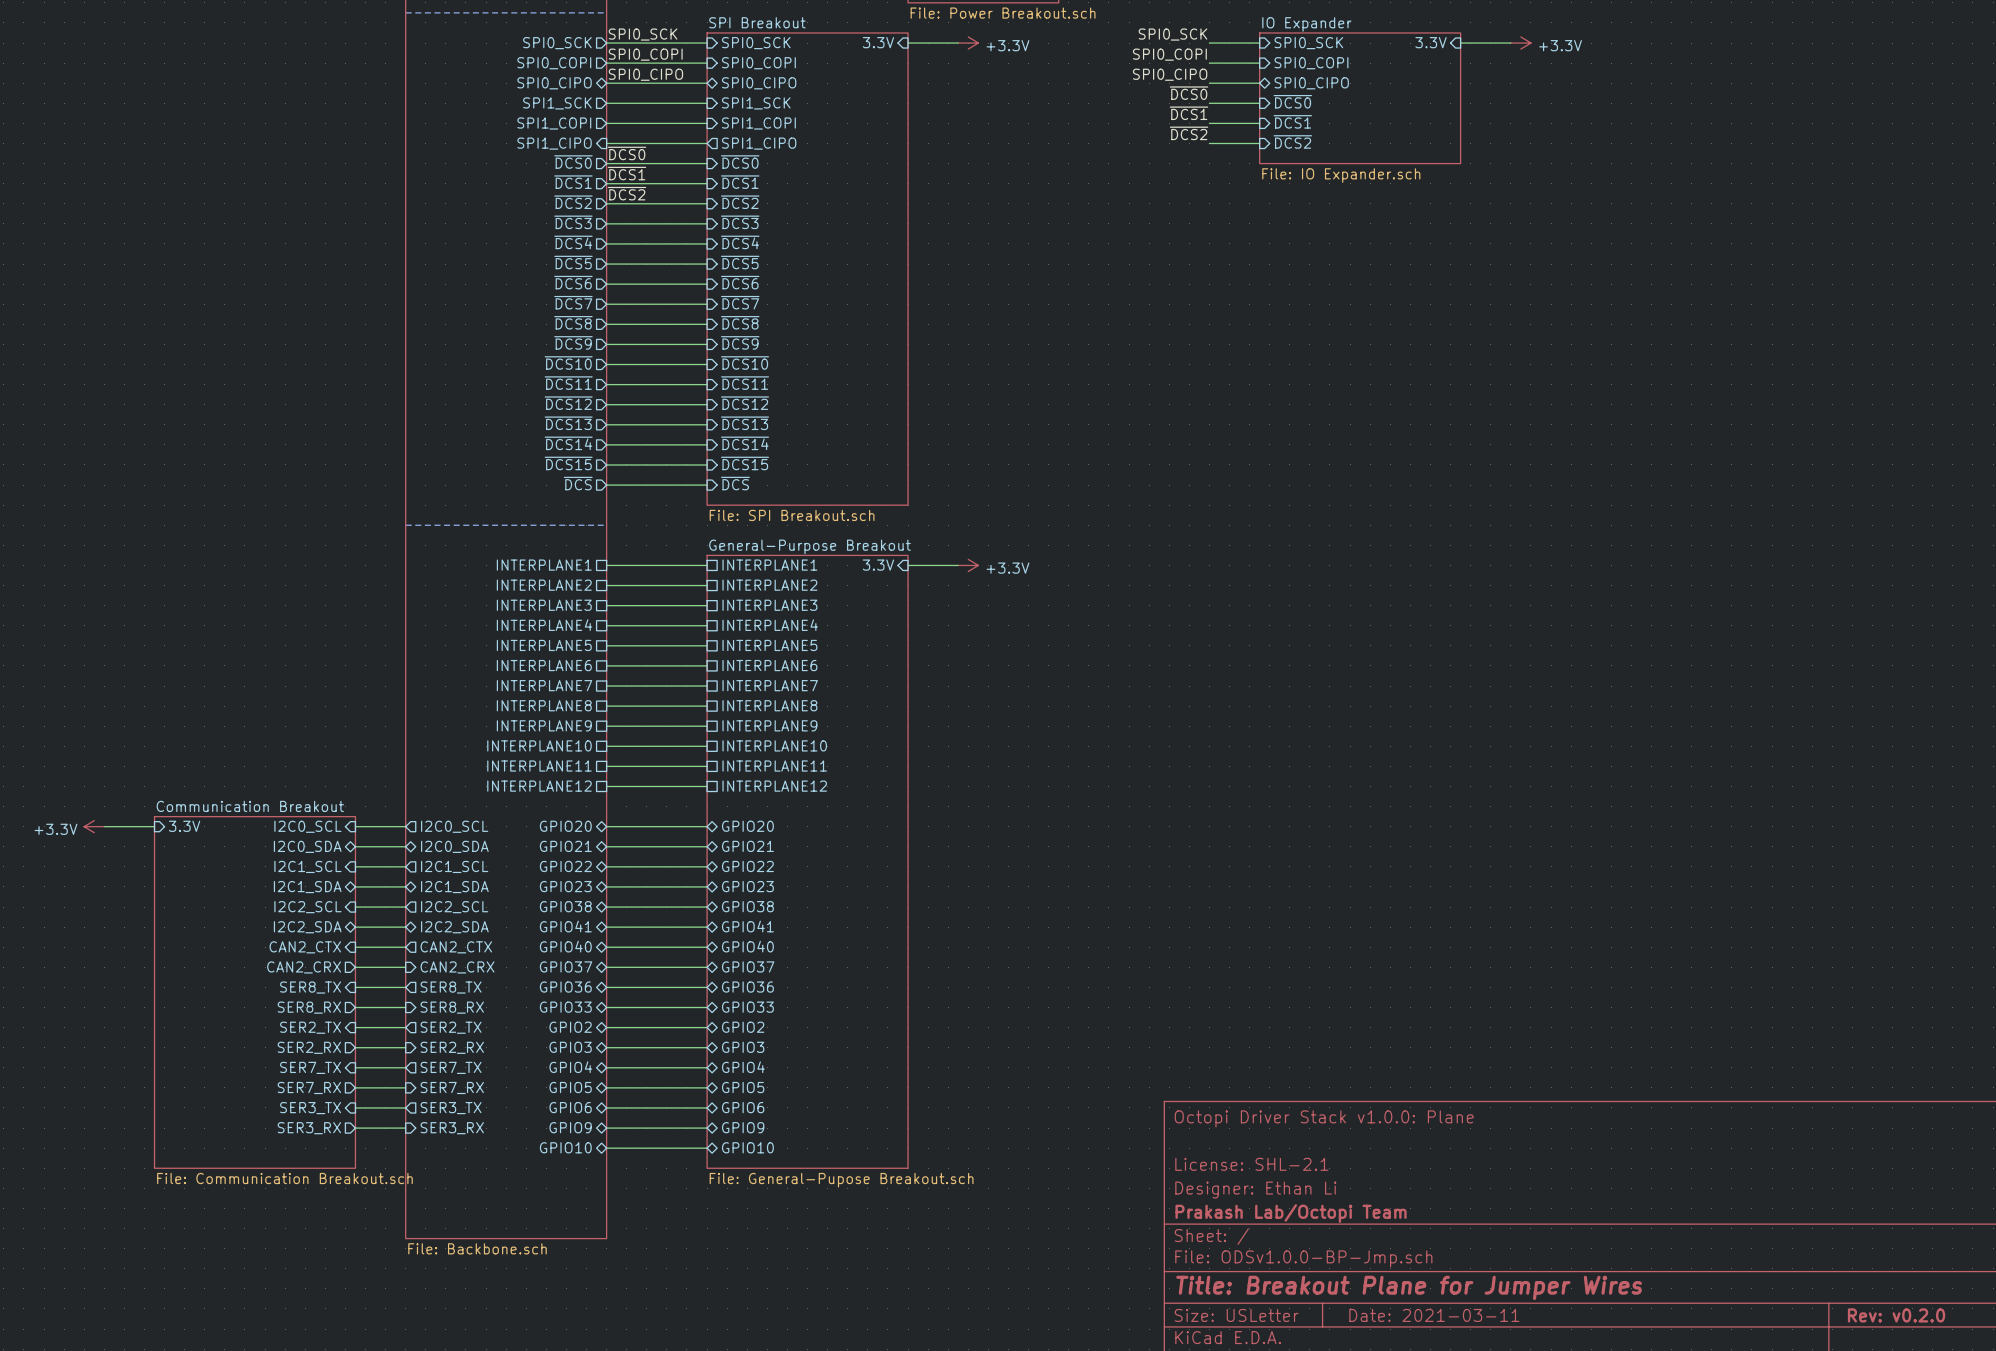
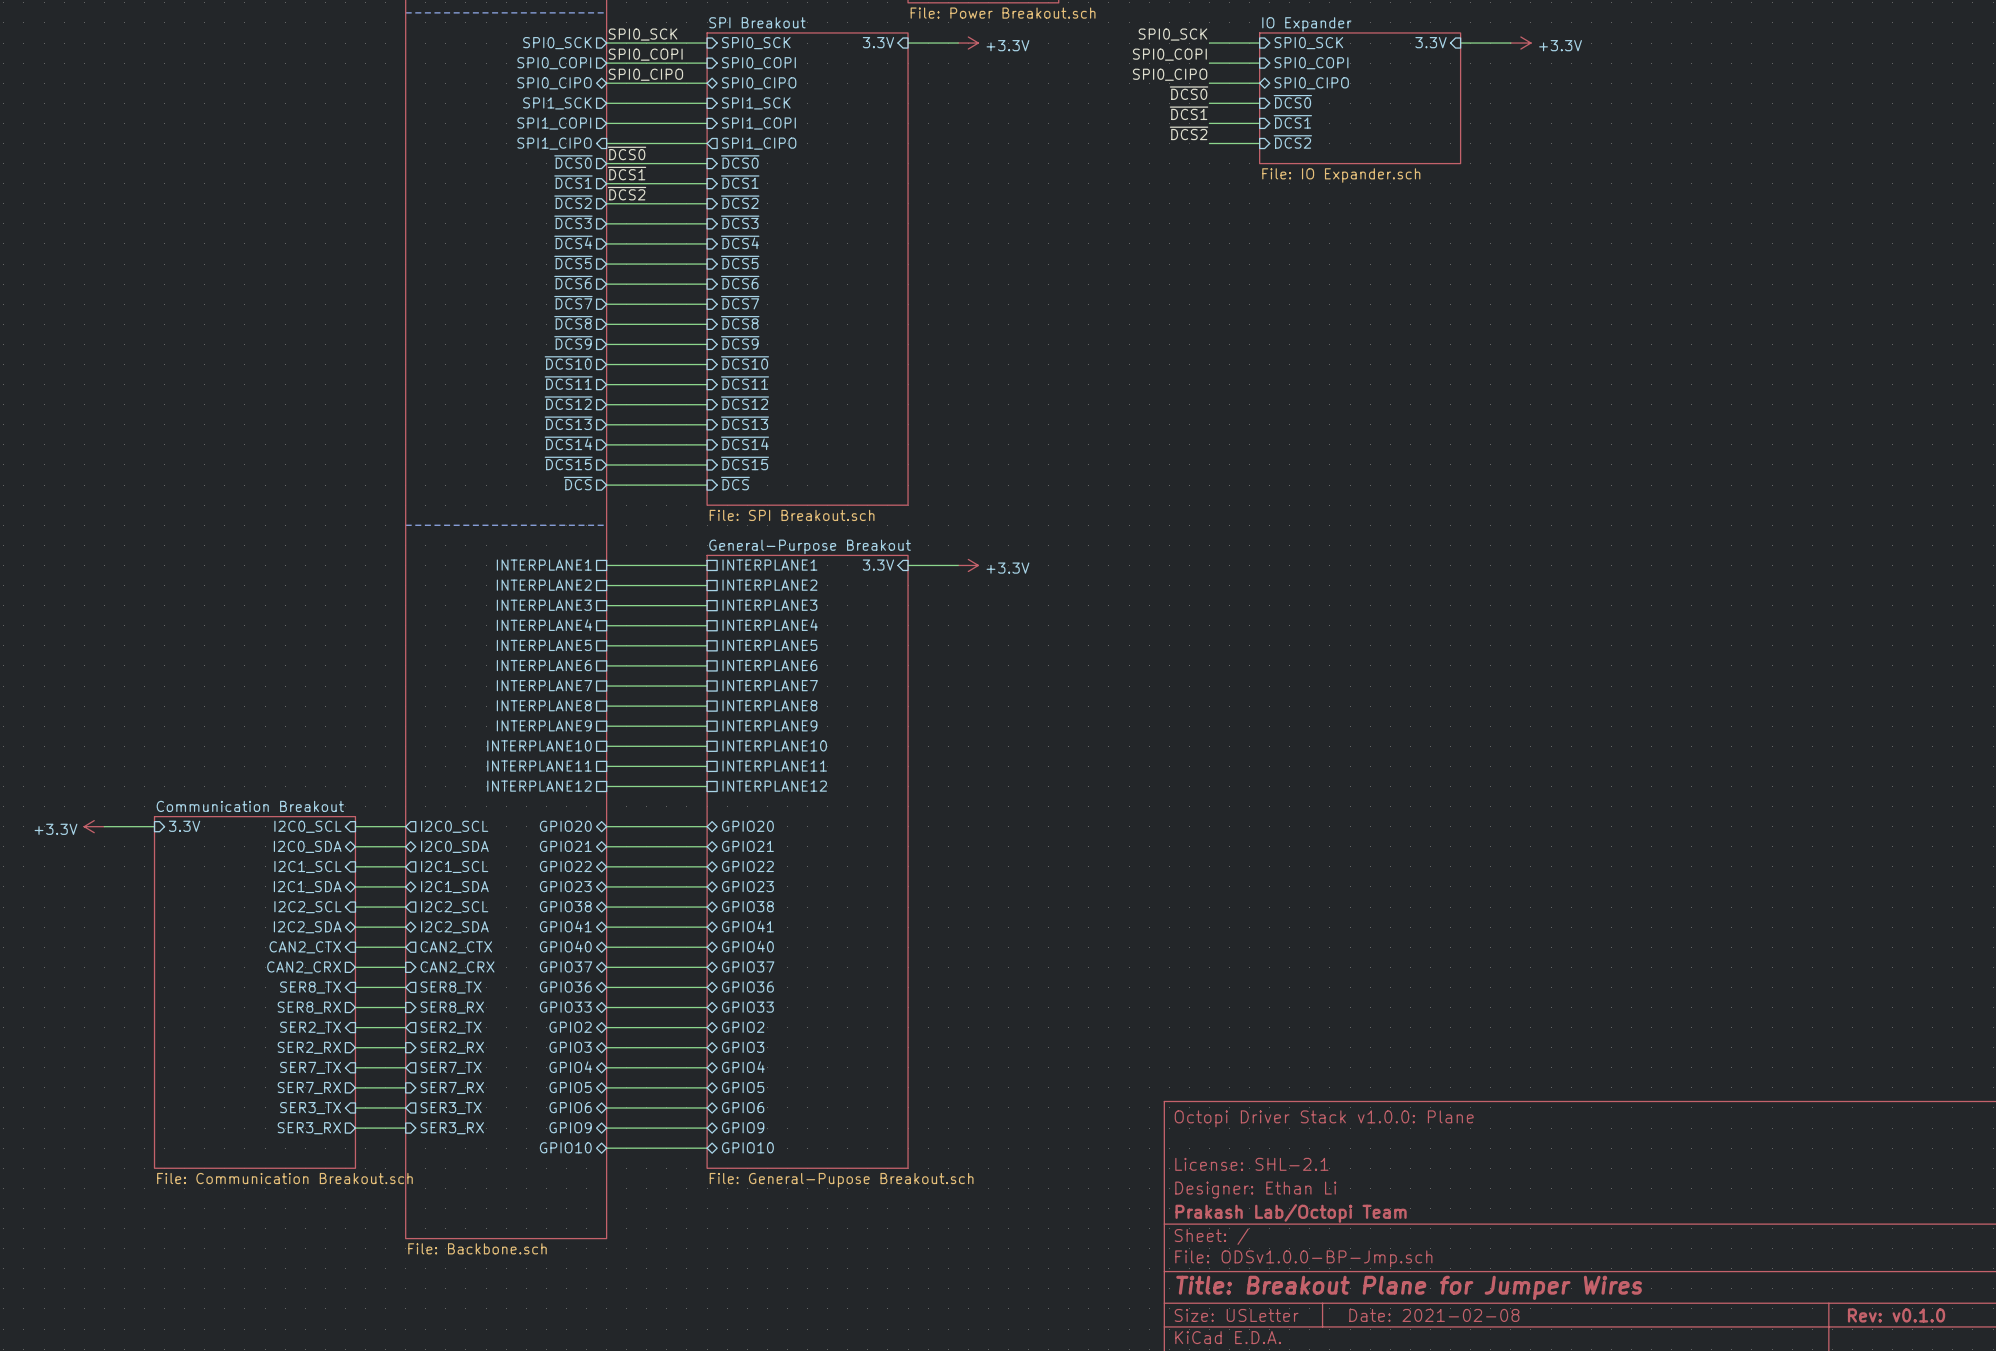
title block: Date: 2021-03-11 (1434, 1315) -> Date: 2021-02-08 (1434, 1315)
title block: Rev: v0.2.0 (1896, 1315) -> Rev: v0.1.0 (1896, 1315)

